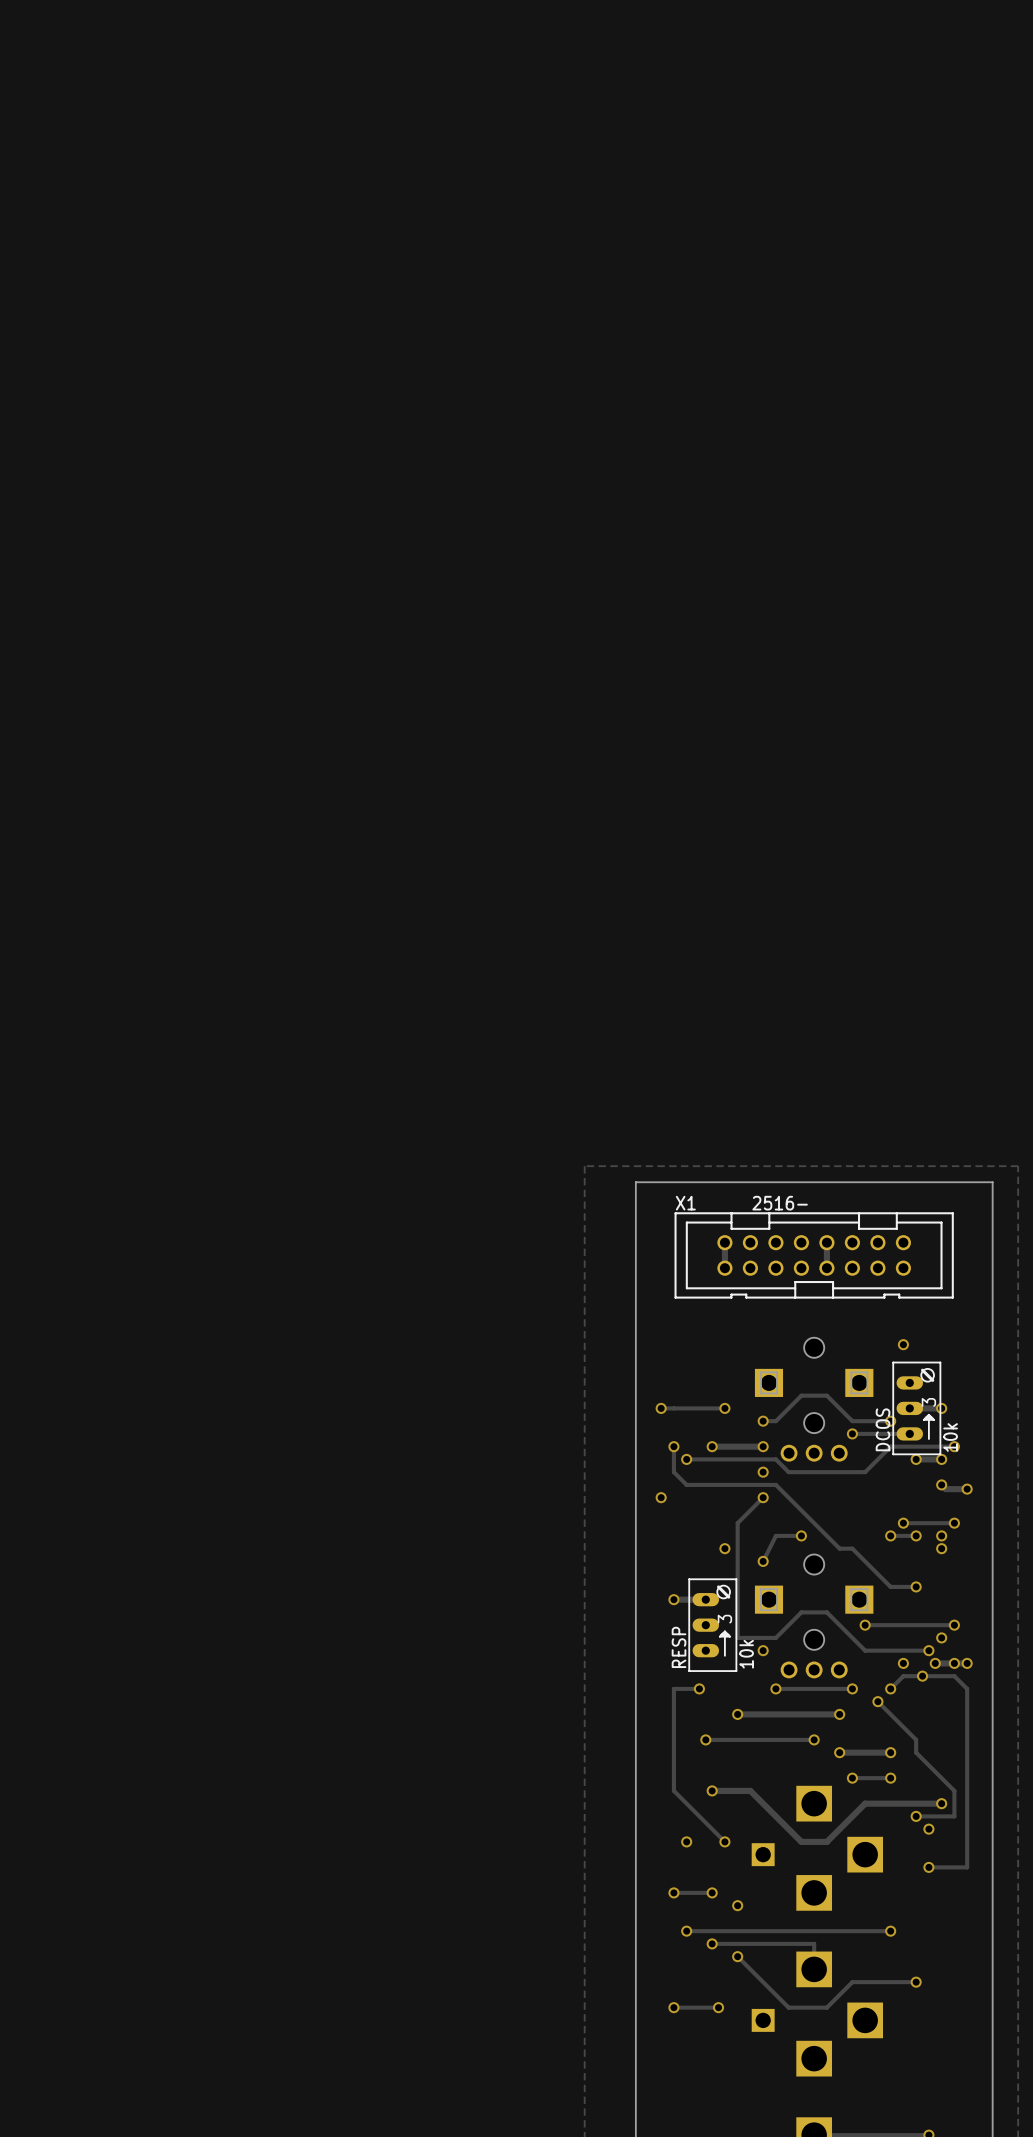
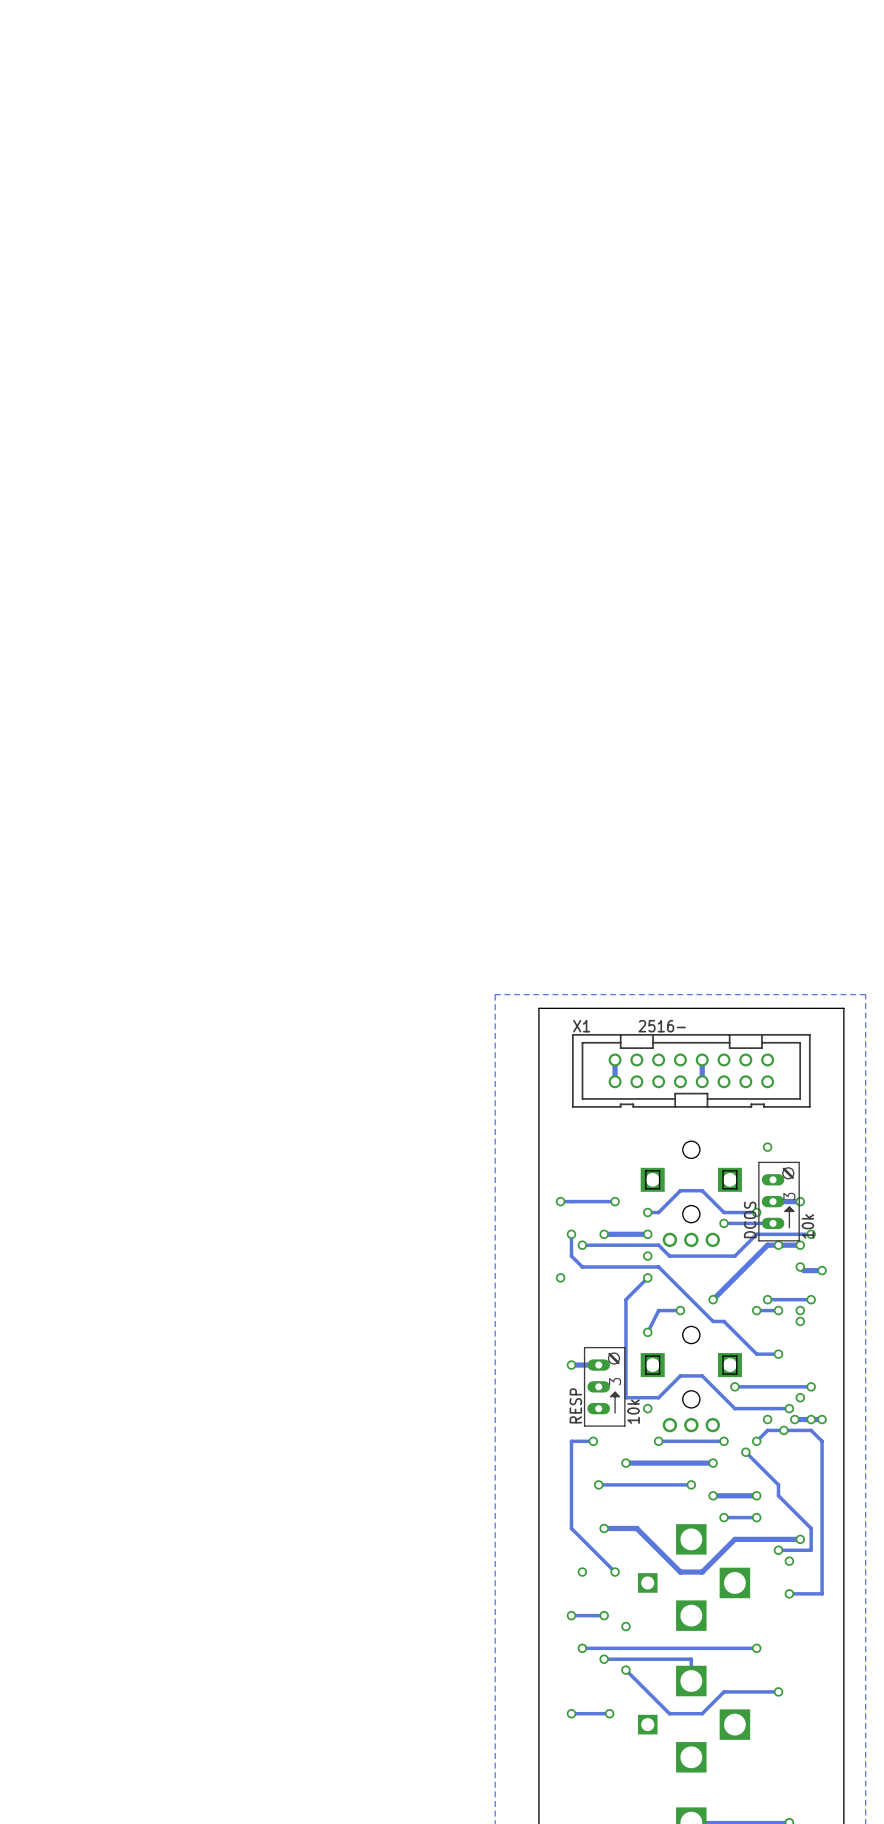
track: none -> (778, 1245) (767, 1245) (713, 1299)
via: none -> (713, 1299)
via: (724, 1548) -> none

